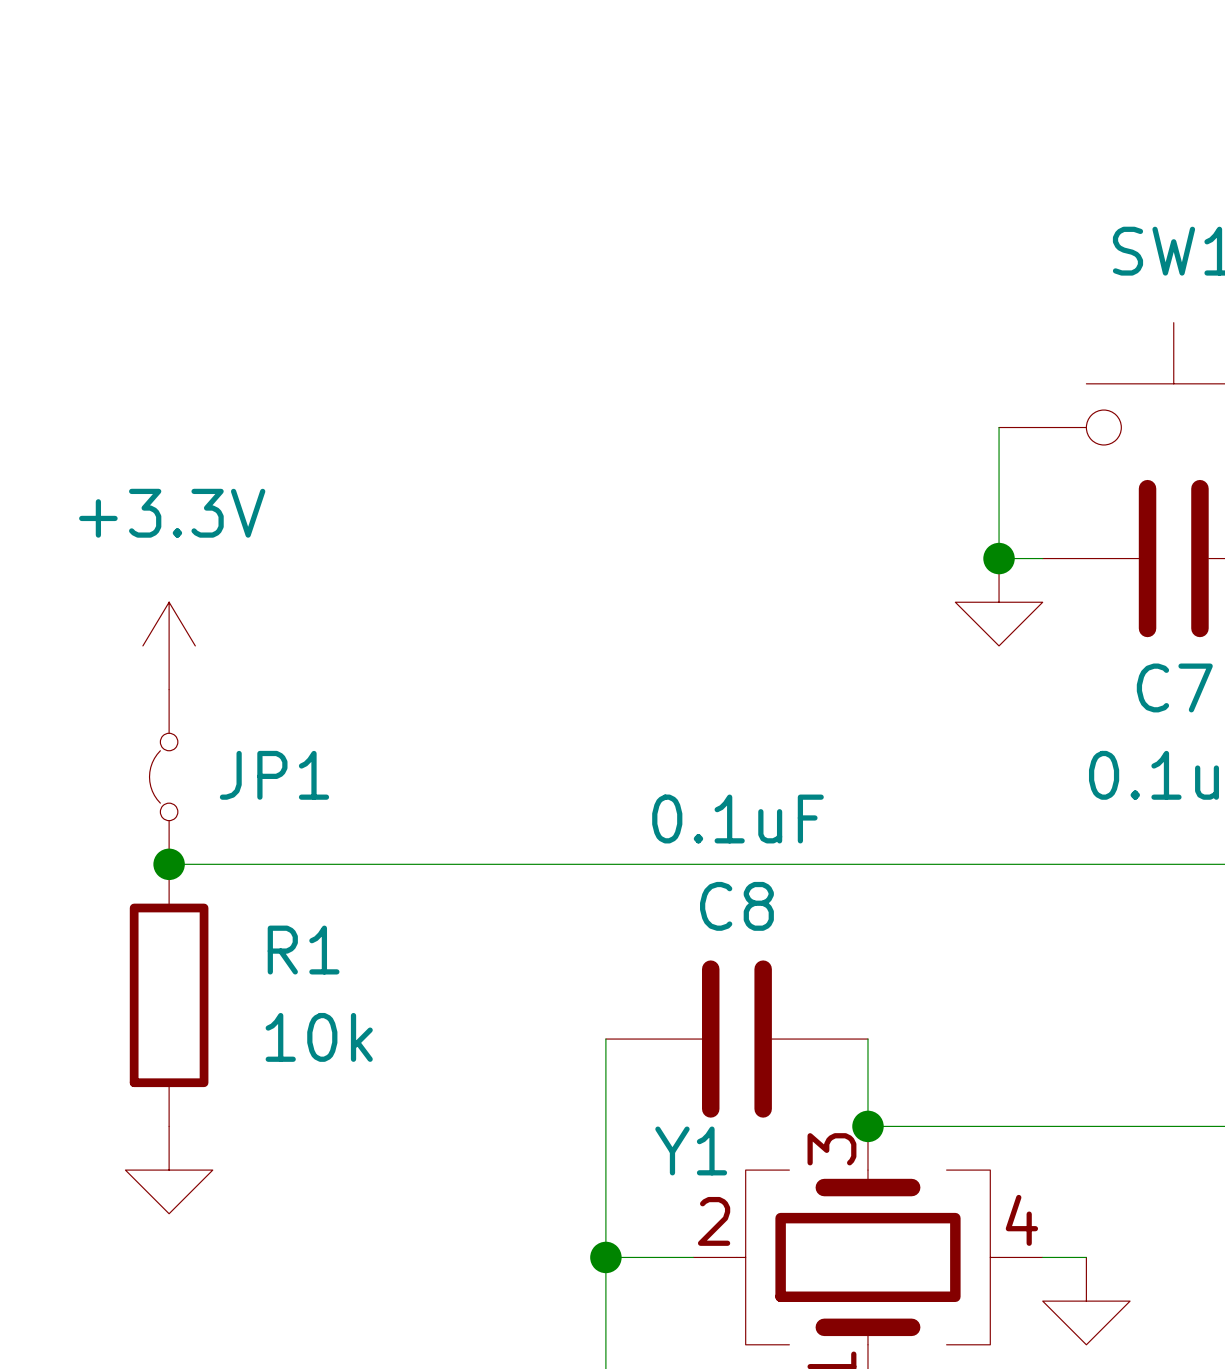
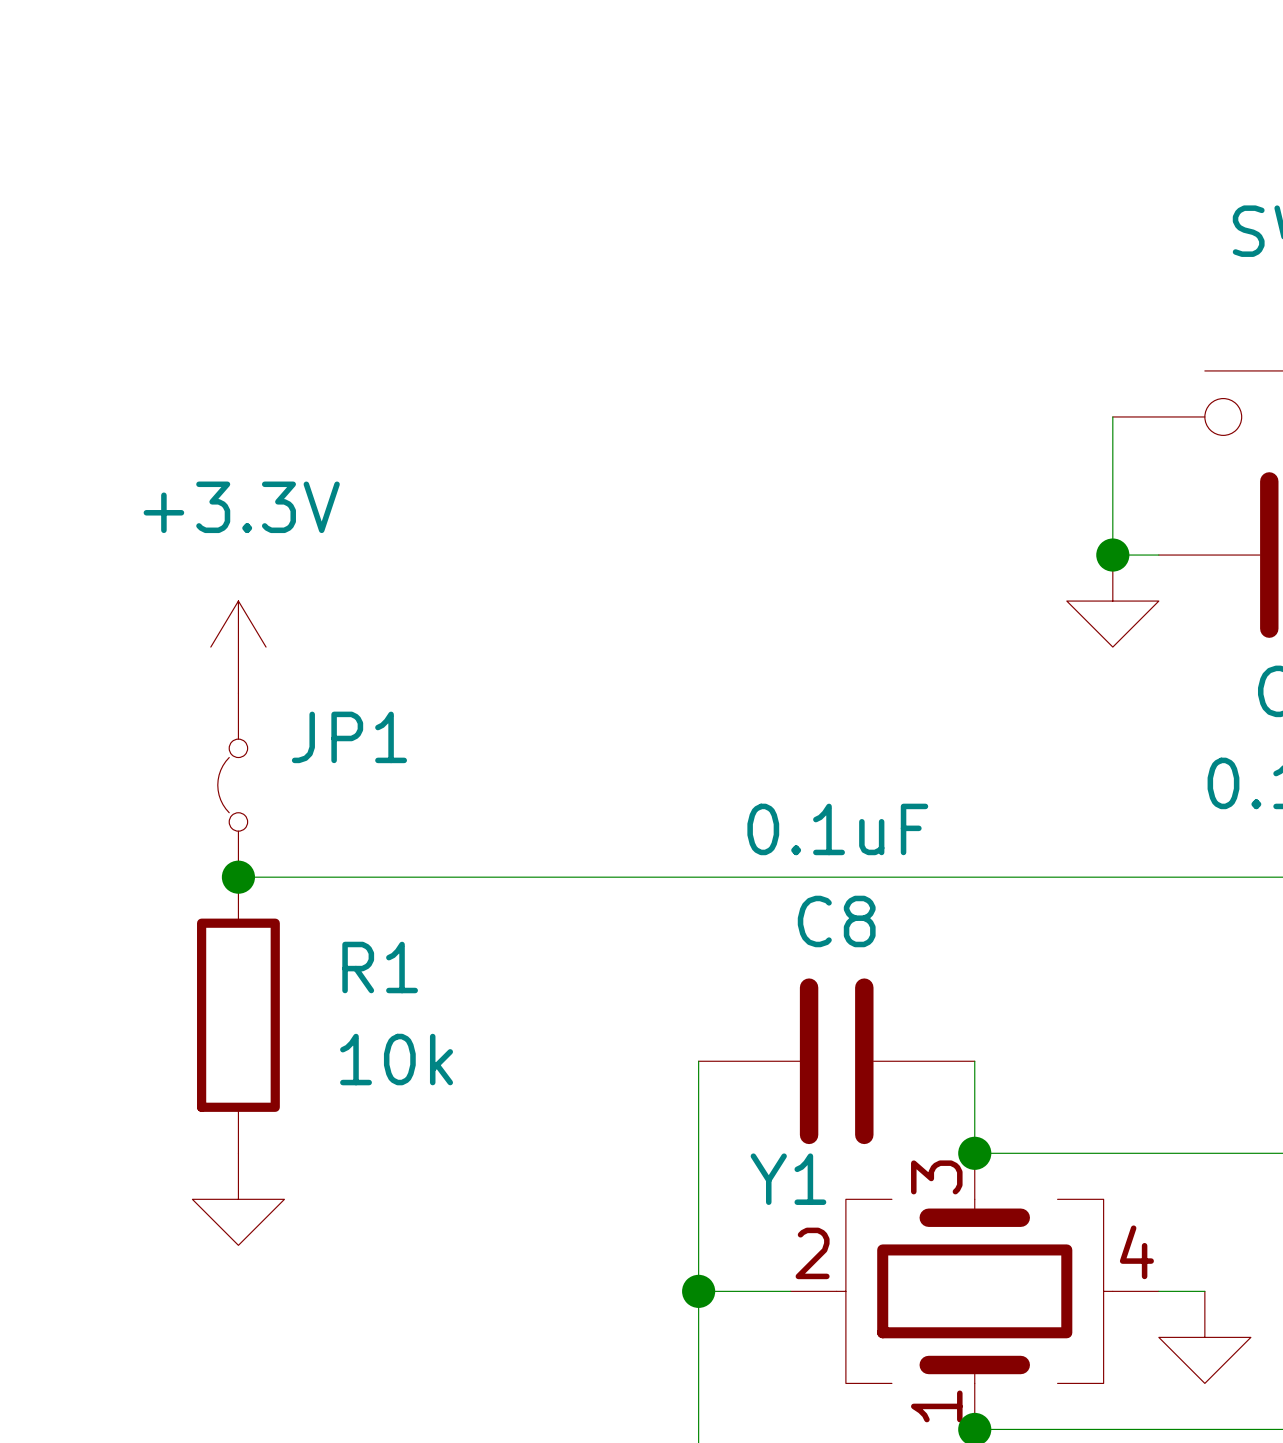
JP1 name position: JP1 (274, 775) -> JP1 (349, 737)

